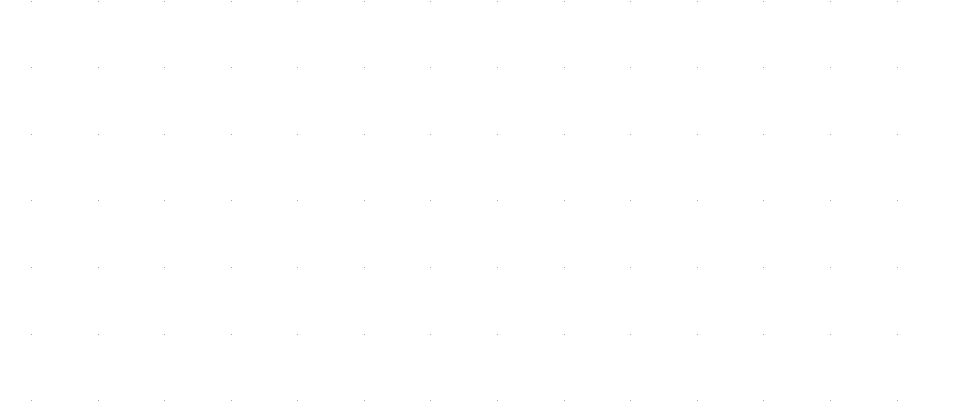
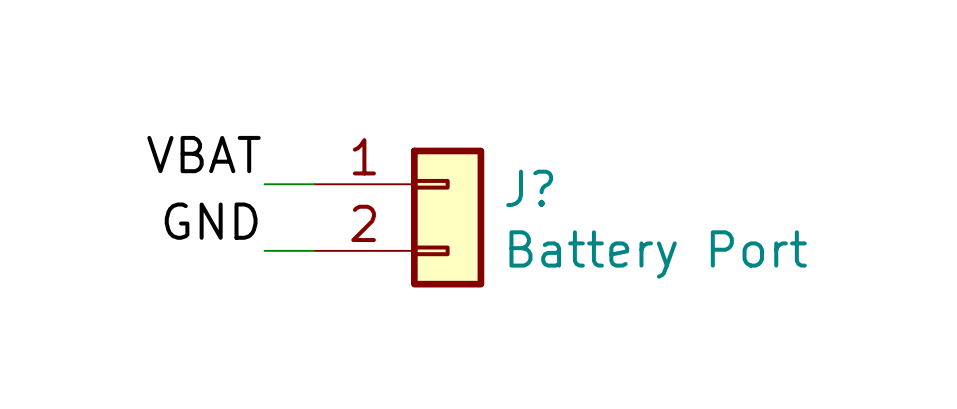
label: none -> VBAT (204, 154)
wire: none -> (264, 184) (314, 184)
J?: none -> Battery Port (399, 217)
label: none -> GND (211, 221)
wire: none -> (264, 250) (314, 250)

